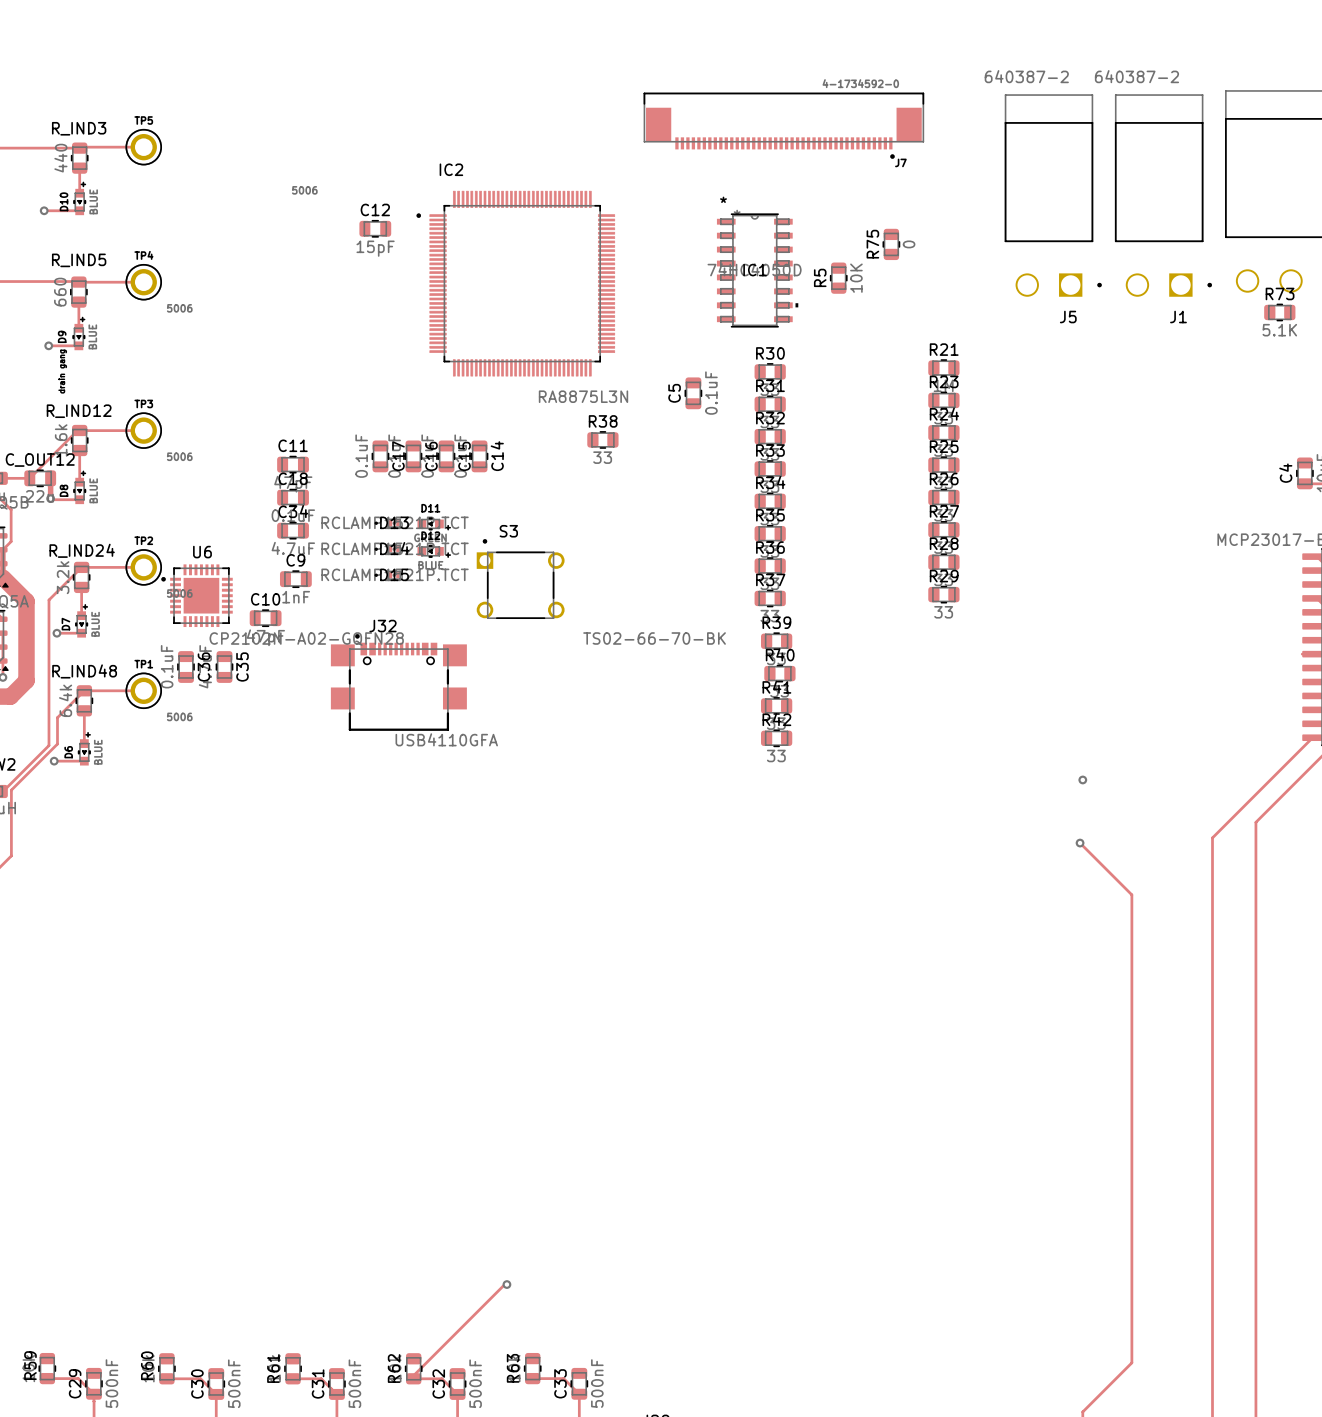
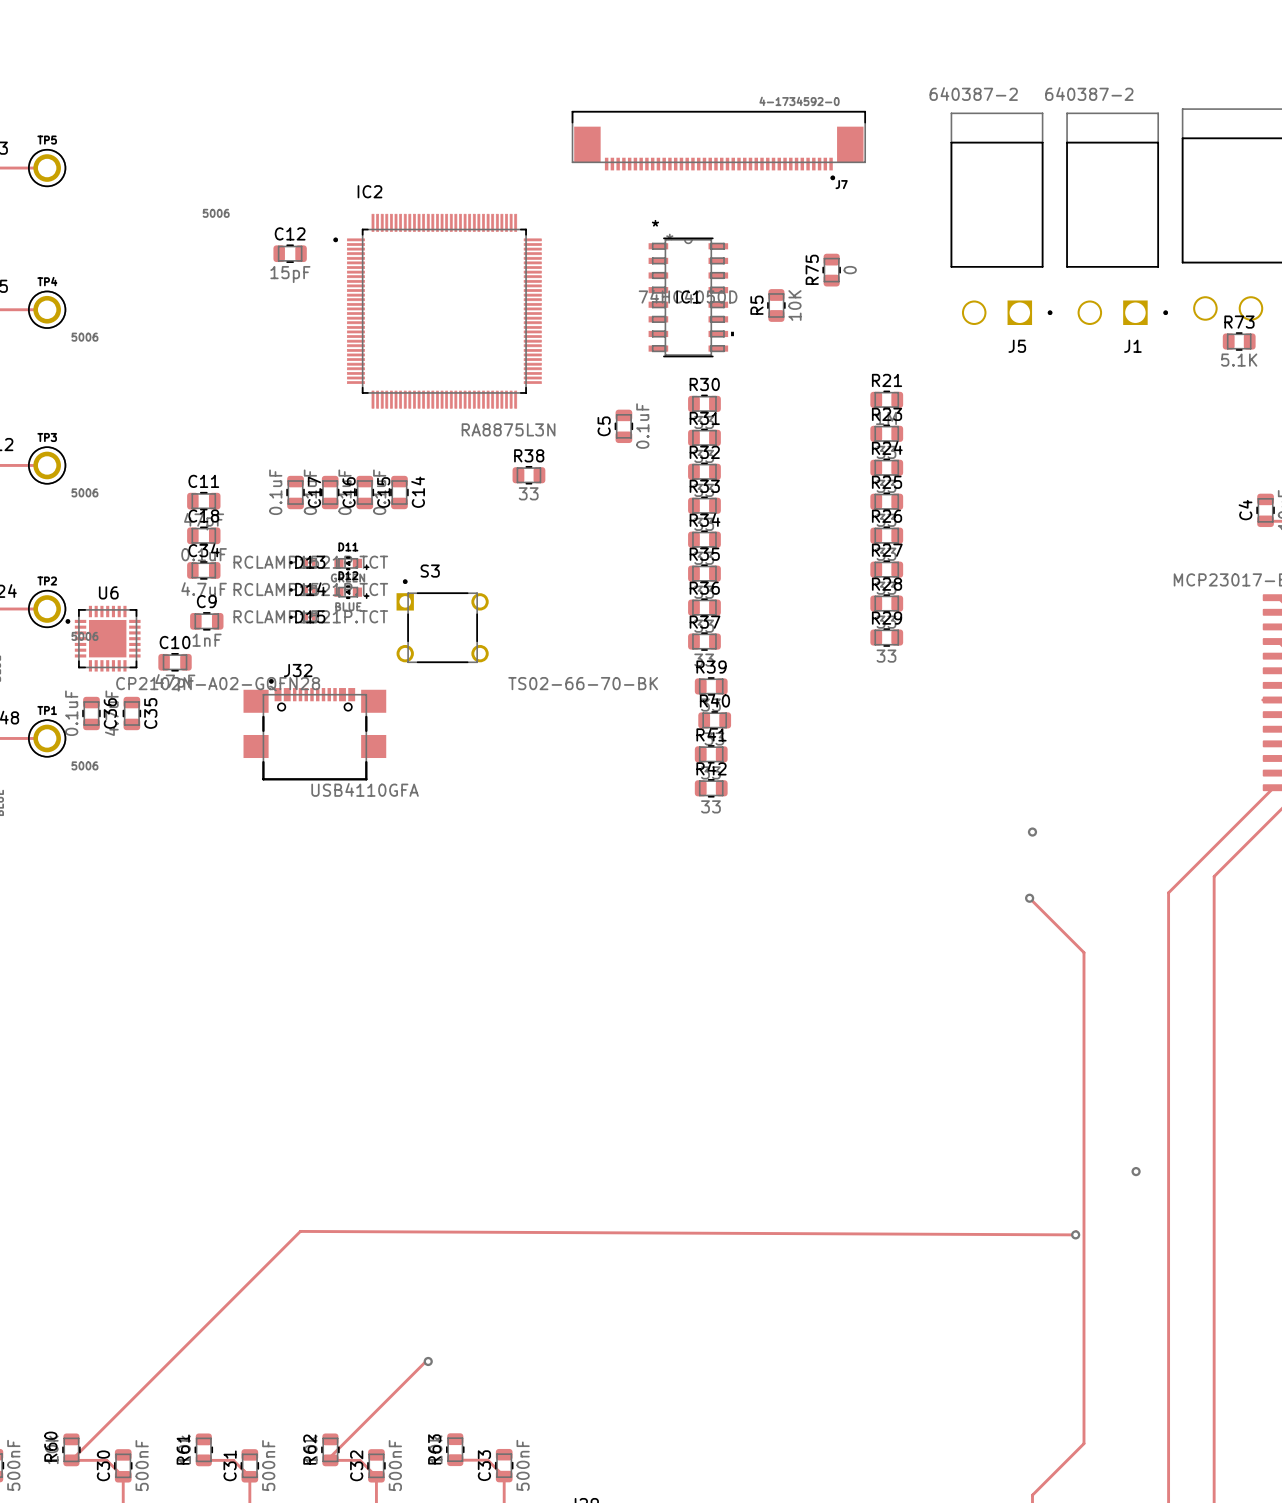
via: none -> (1136, 1171)
track: none -> (1076, 1231) (1075, 1234) (300, 1231) (71, 1460)
via: none -> (1075, 1234)

